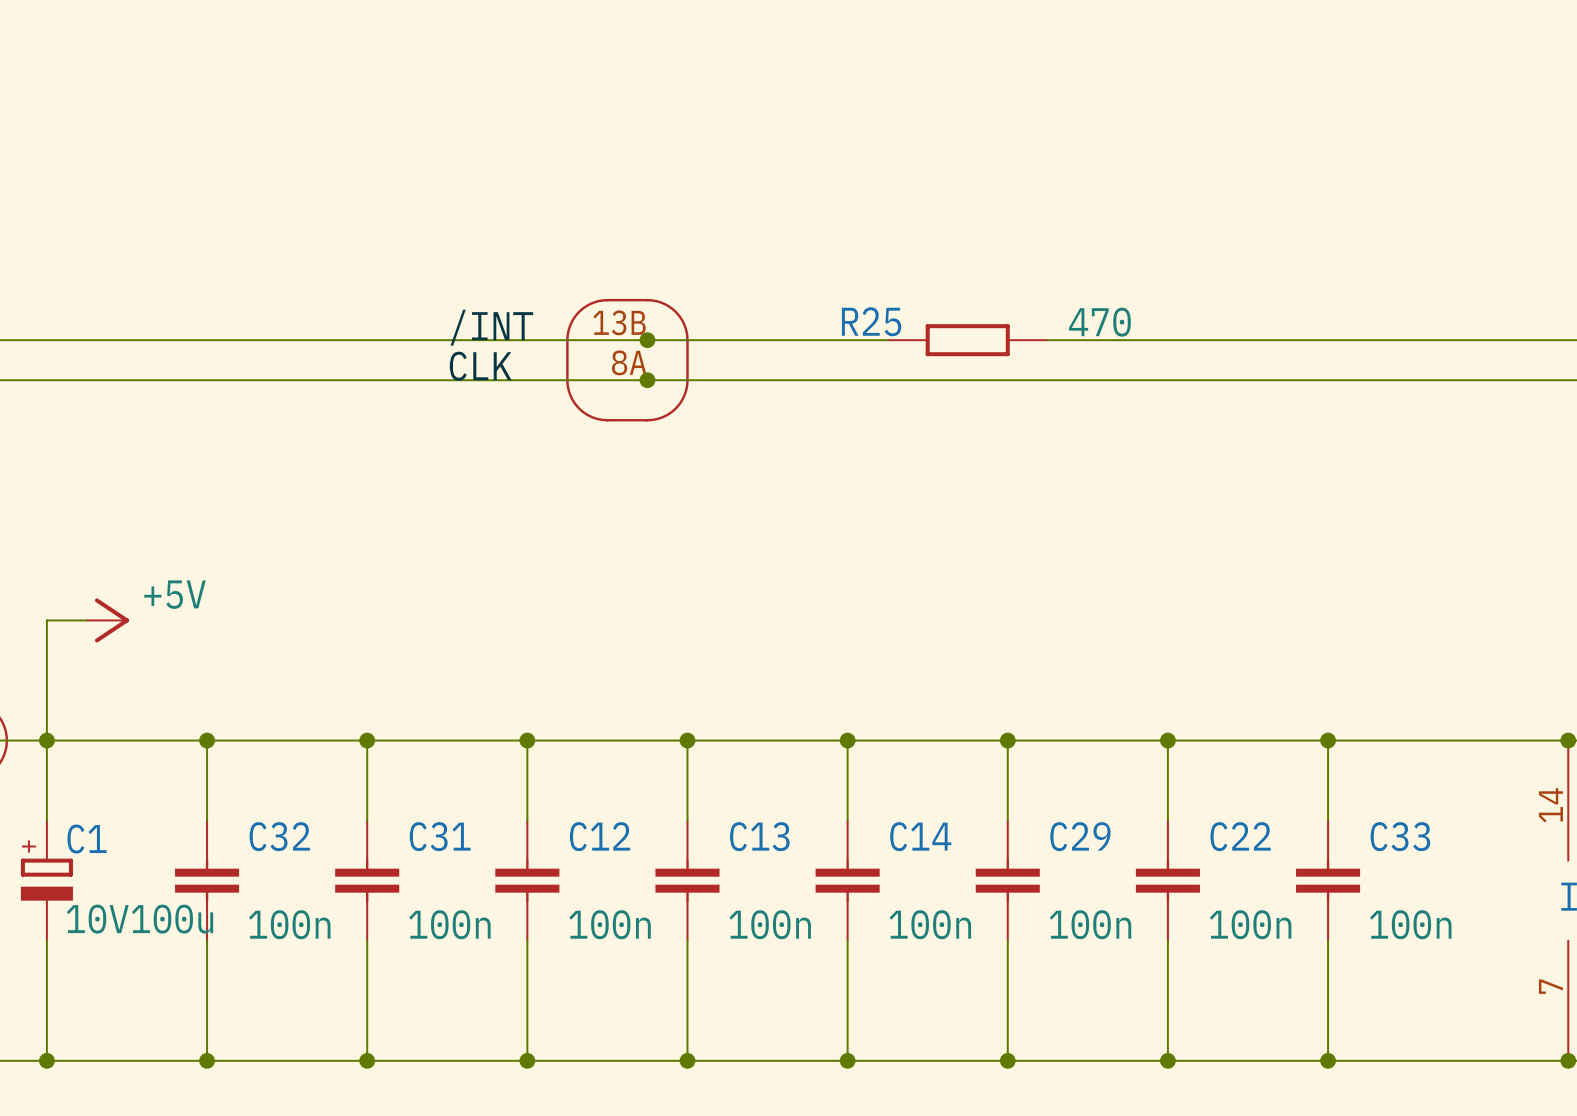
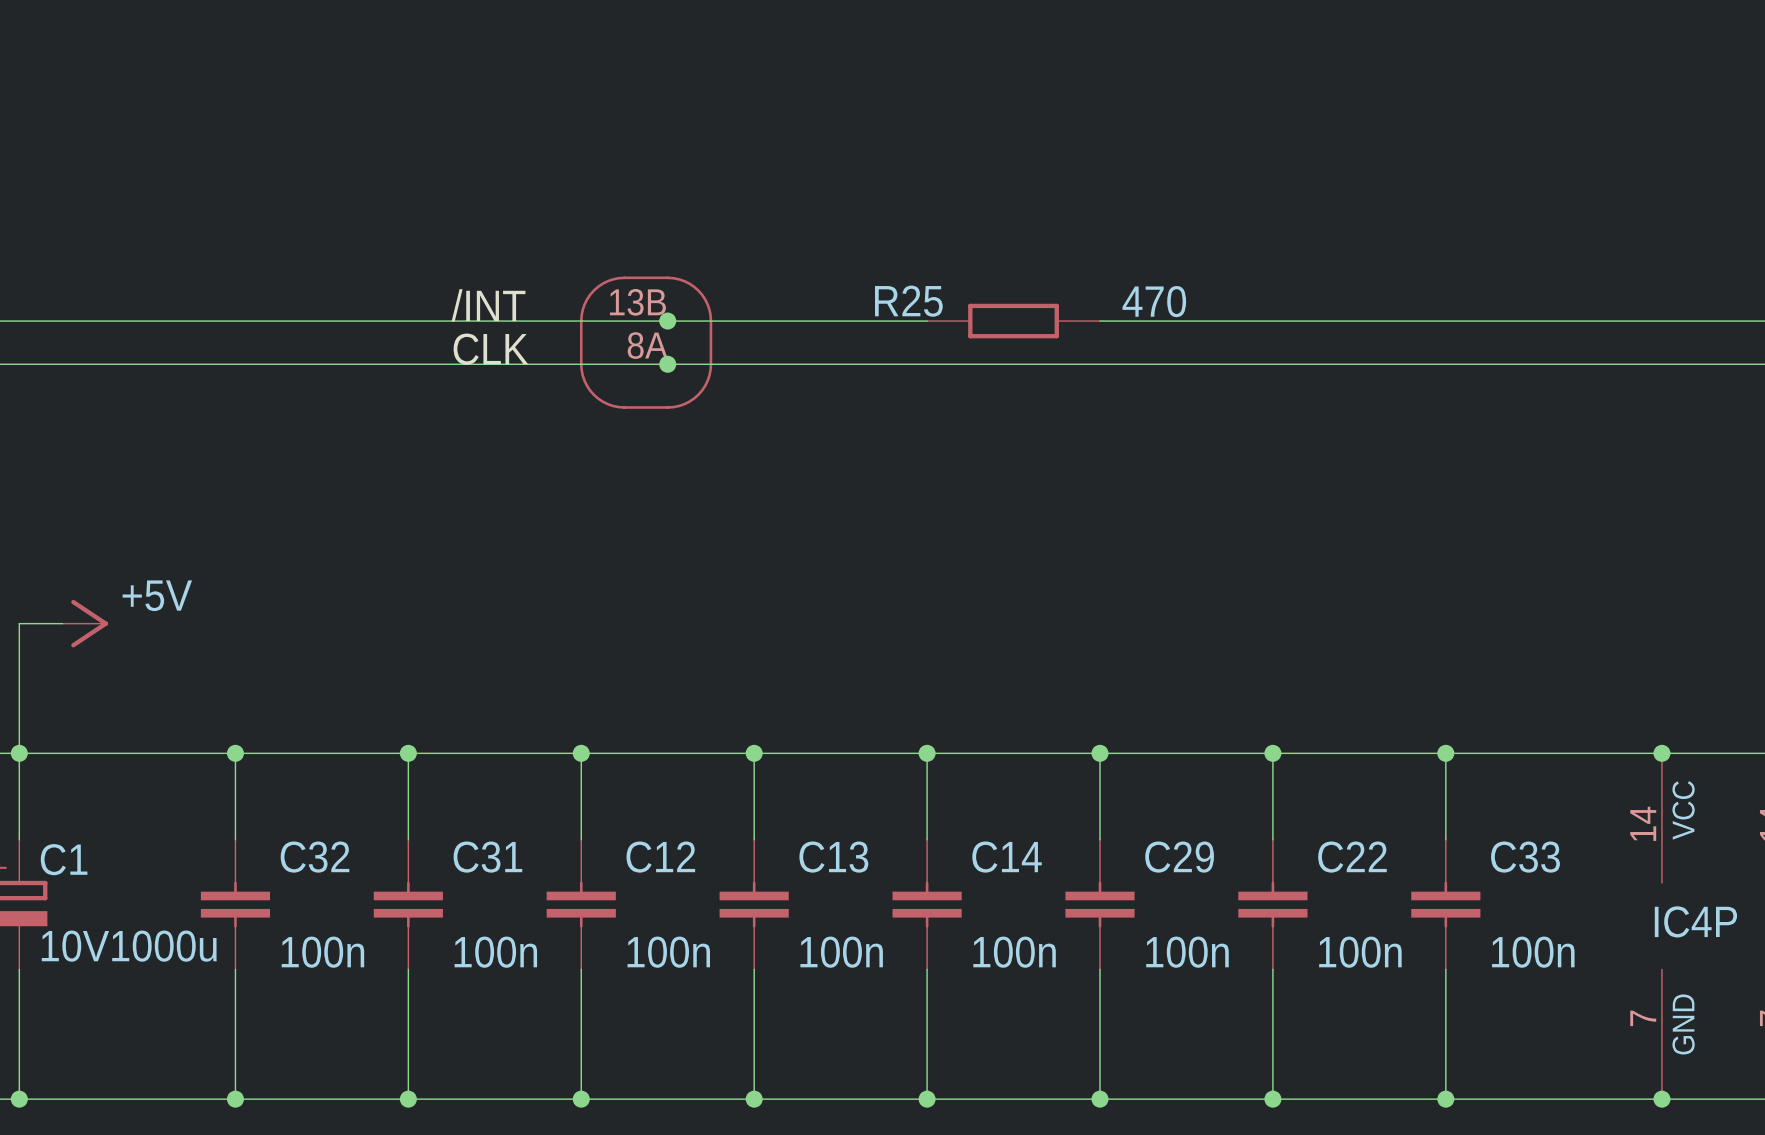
wire: (207, 740) (207, 820) -> (235, 753) (235, 839)
junction position: (207, 740) -> (235, 753)
wire: (367, 740) (367, 820) -> (408, 753) (408, 839)
junction position: (367, 740) -> (408, 753)
wire: (527, 740) (527, 820) -> (581, 753) (581, 839)
junction position: (527, 740) -> (581, 753)
wire: (687, 740) (687, 820) -> (754, 753) (754, 839)
junction position: (687, 740) -> (754, 753)
wire: (847, 740) (847, 820) -> (927, 753) (927, 839)
junction position: (847, 740) -> (927, 753)
wire: (1007, 740) (1007, 820) -> (1100, 753) (1100, 839)
junction position: (1007, 740) -> (1100, 753)
wire: (1167, 740) (1167, 820) -> (1272, 753) (1272, 839)
junction position: (1167, 740) -> (1272, 753)
wire: (1328, 740) (1328, 820) -> (1445, 753) (1445, 839)
junction position: (1328, 740) -> (1445, 753)
C32 position: (207, 880) -> (235, 904)
C31 position: (367, 880) -> (408, 904)
C12 position: (527, 880) -> (581, 904)
C13 position: (687, 880) -> (754, 904)
C14 position: (847, 880) -> (927, 904)
C29 position: (1007, 880) -> (1100, 904)
C22 position: (1167, 880) -> (1272, 904)
C33 position: (1328, 880) -> (1445, 904)
C1 value: 10V100u (140, 919) -> 10V1000u (129, 946)
wire: (207, 940) (207, 1060) -> (235, 969) (235, 1099)
wire: (367, 940) (367, 1060) -> (408, 969) (408, 1099)
wire: (527, 940) (527, 1060) -> (581, 969) (581, 1099)
wire: (687, 940) (687, 1060) -> (754, 969) (754, 1099)
wire: (847, 940) (847, 1060) -> (927, 969) (927, 1099)
wire: (1007, 940) (1007, 1060) -> (1100, 969) (1100, 1099)
wire: (1167, 940) (1167, 1060) -> (1272, 969) (1272, 1099)
wire: (1328, 940) (1328, 1060) -> (1445, 969) (1445, 1099)
junction position: (207, 1060) -> (235, 1099)
junction position: (367, 1060) -> (408, 1099)
junction position: (527, 1060) -> (581, 1099)
junction position: (687, 1060) -> (754, 1099)
junction position: (847, 1060) -> (927, 1099)
junction position: (1007, 1060) -> (1100, 1099)
junction position: (1167, 1060) -> (1272, 1099)
junction position: (1328, 1060) -> (1445, 1099)

